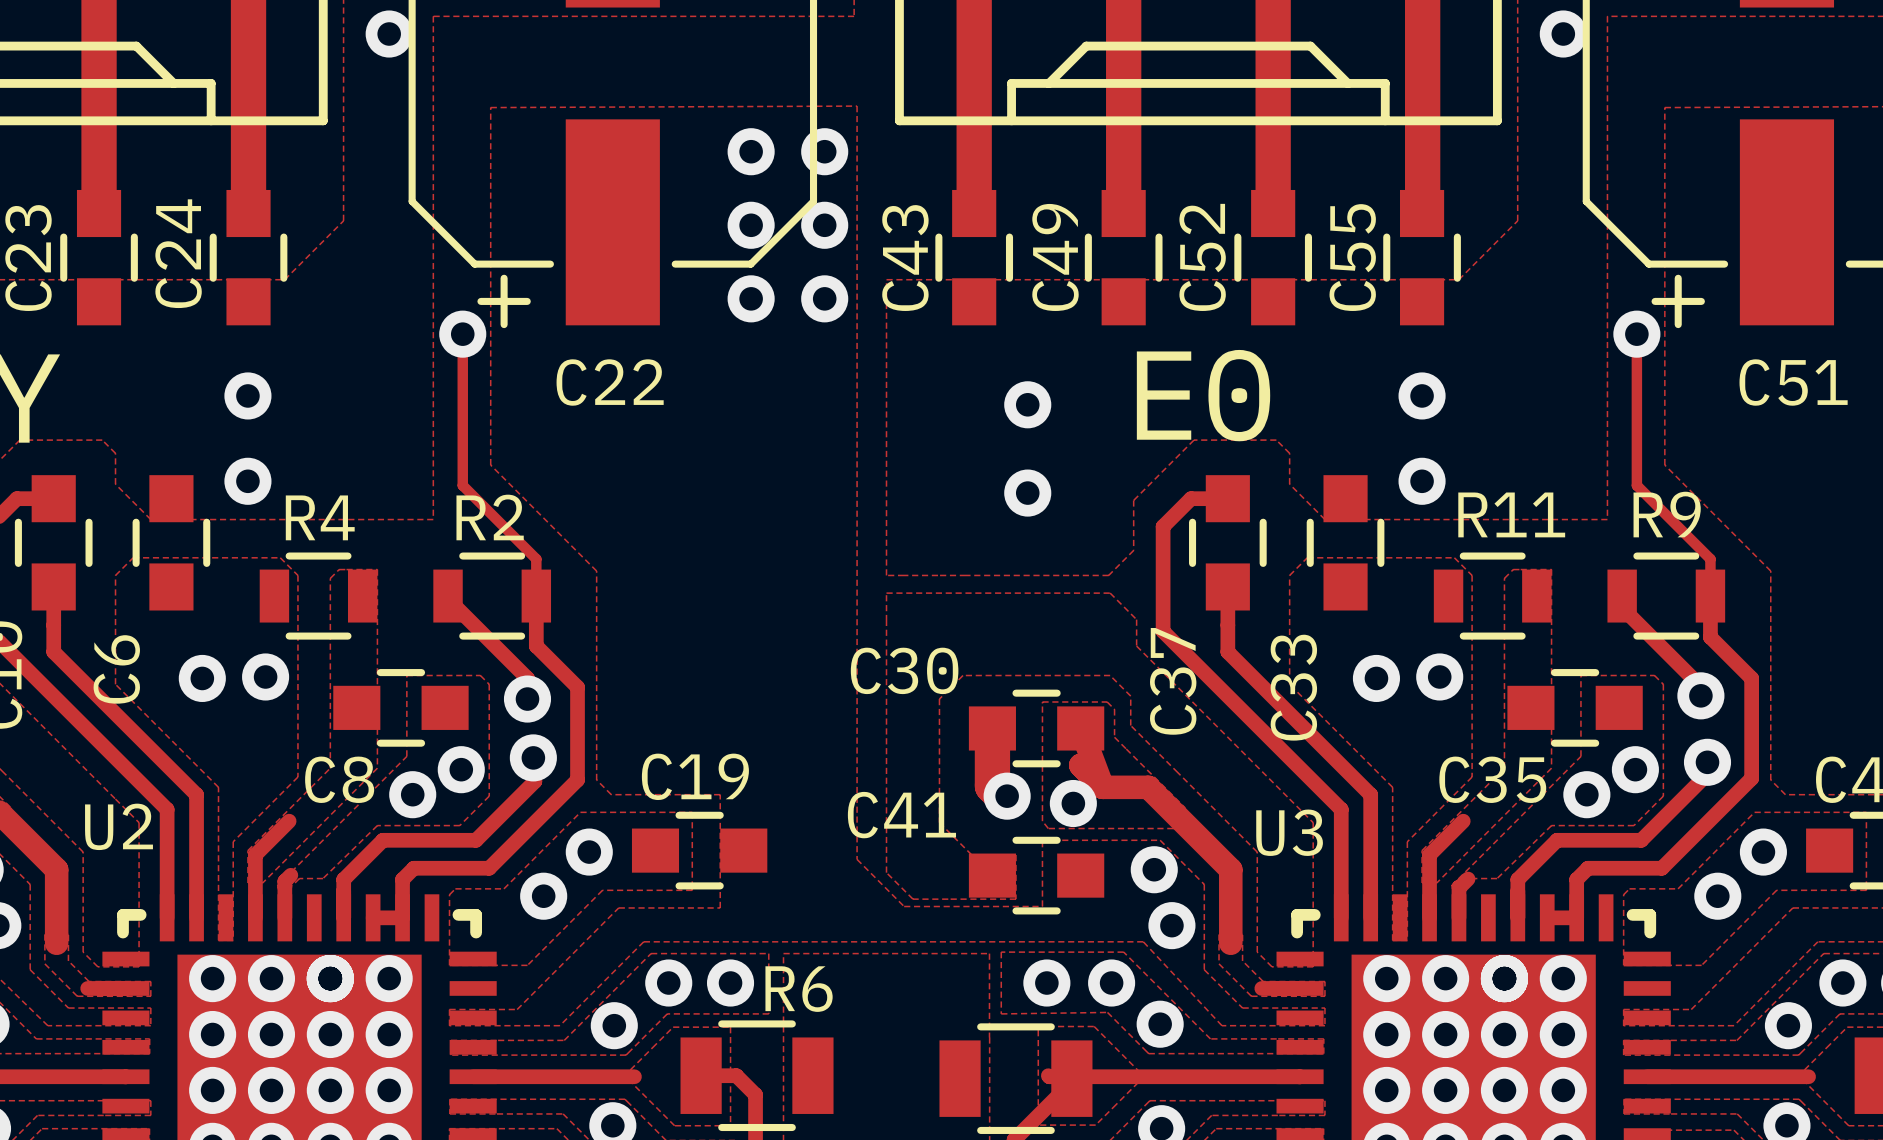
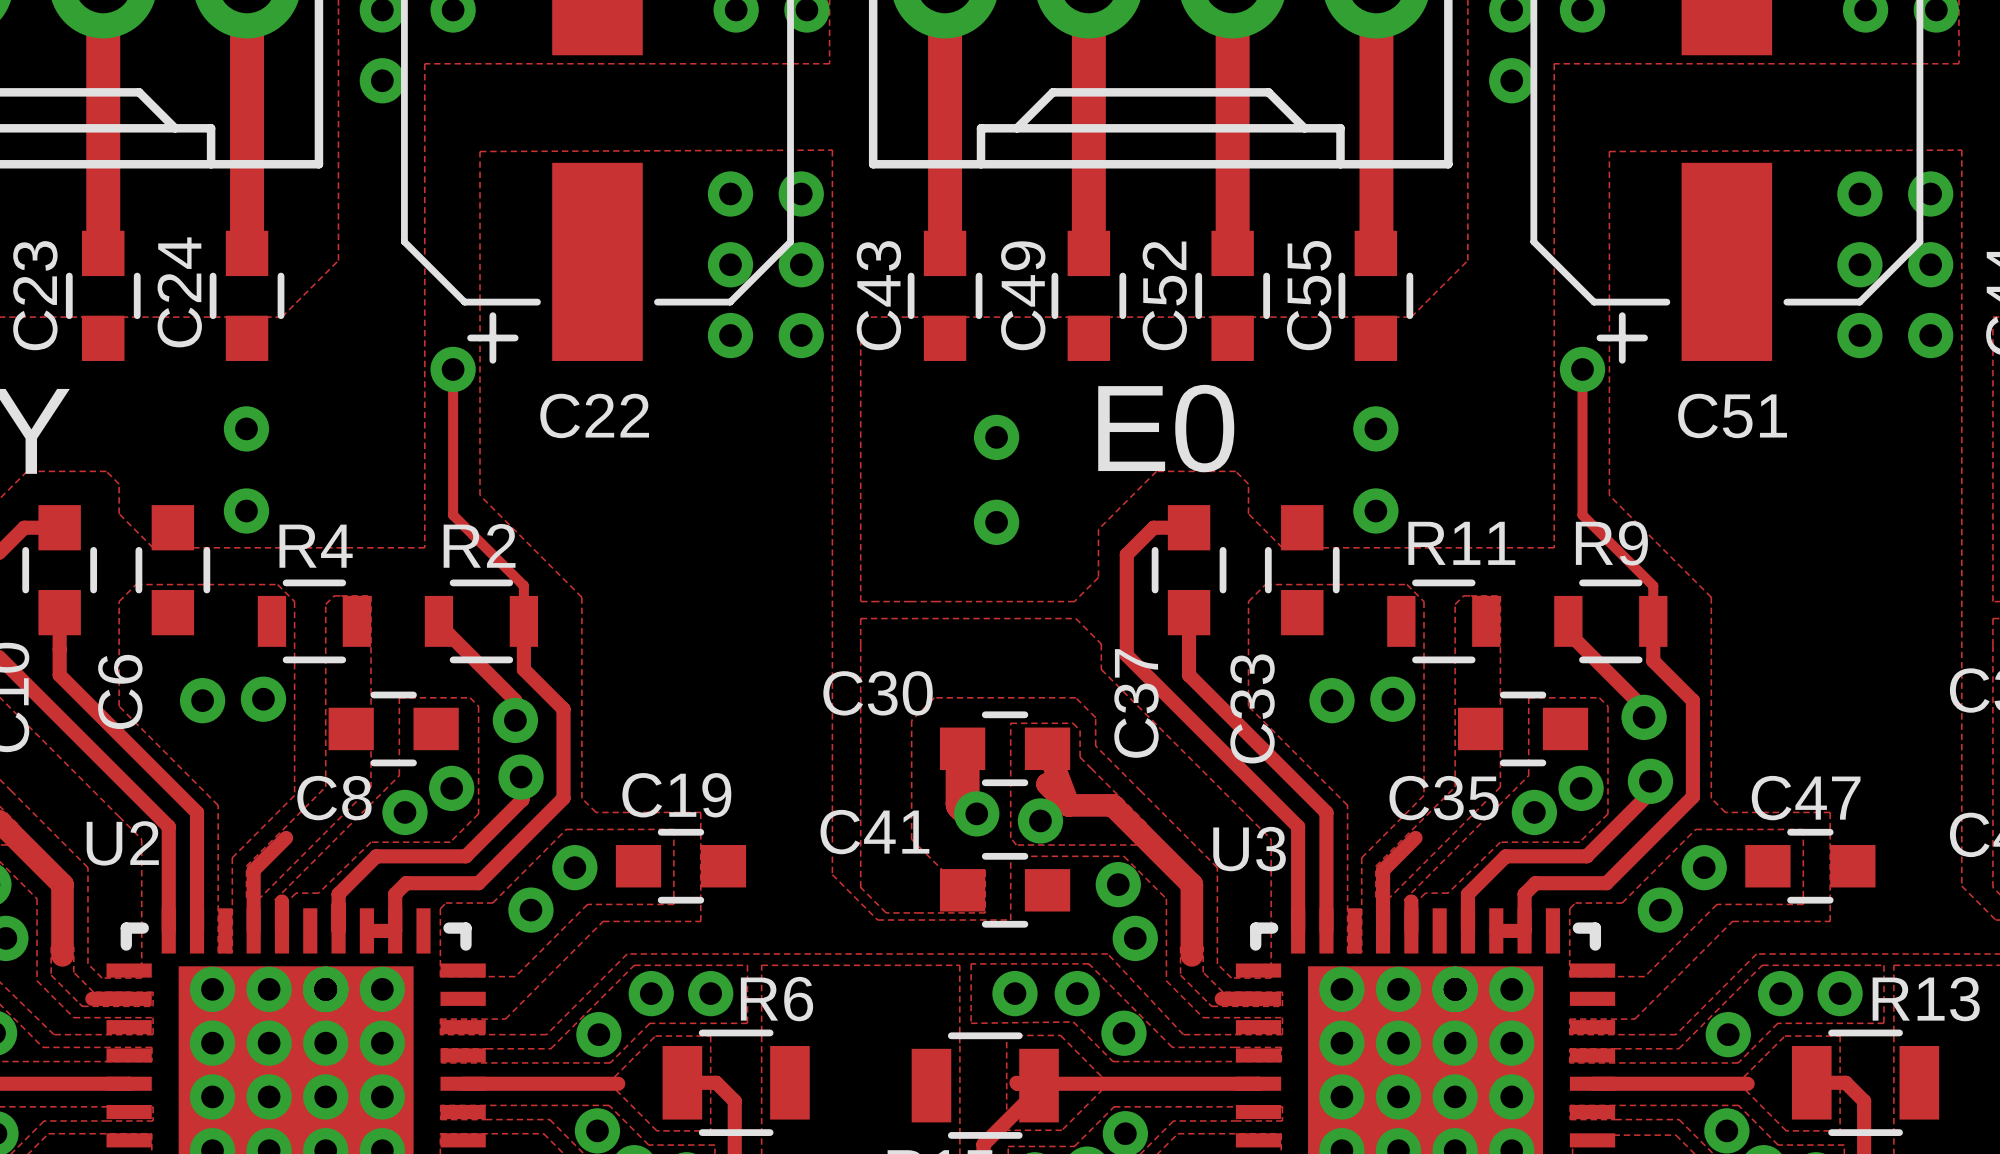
track: (290, 875) (284, 881) (284, 887) -> none
track: (1468, 879) (1459, 887) -> none

